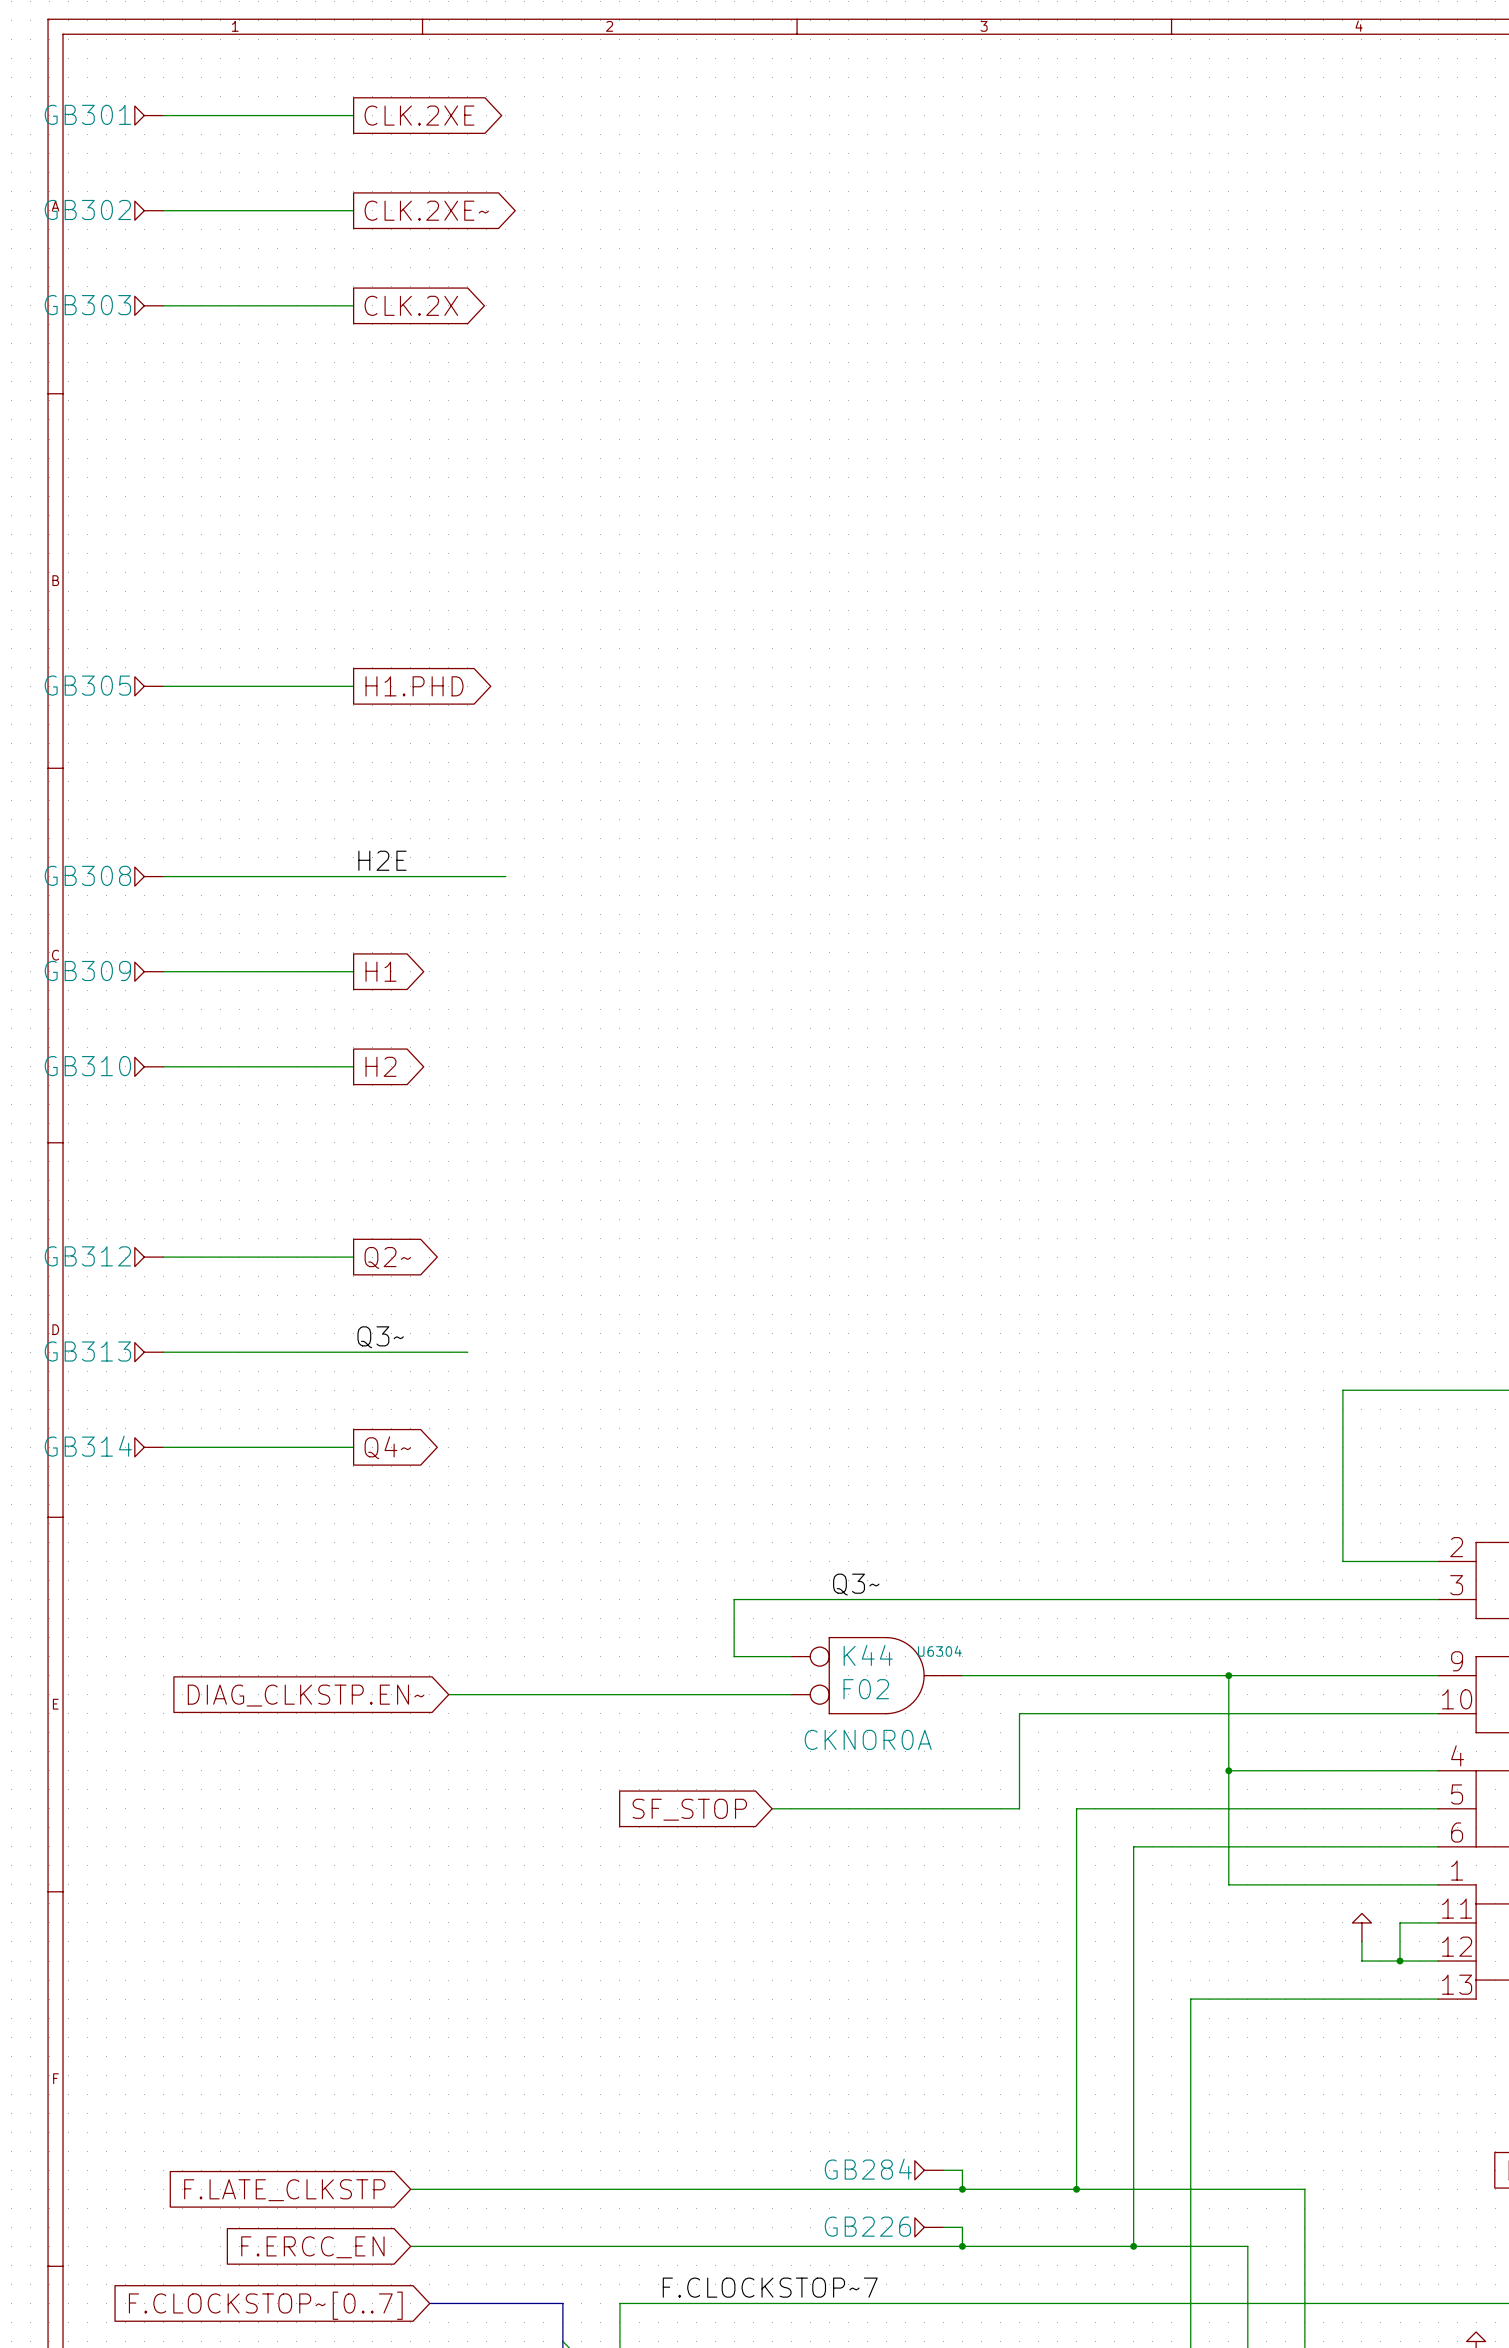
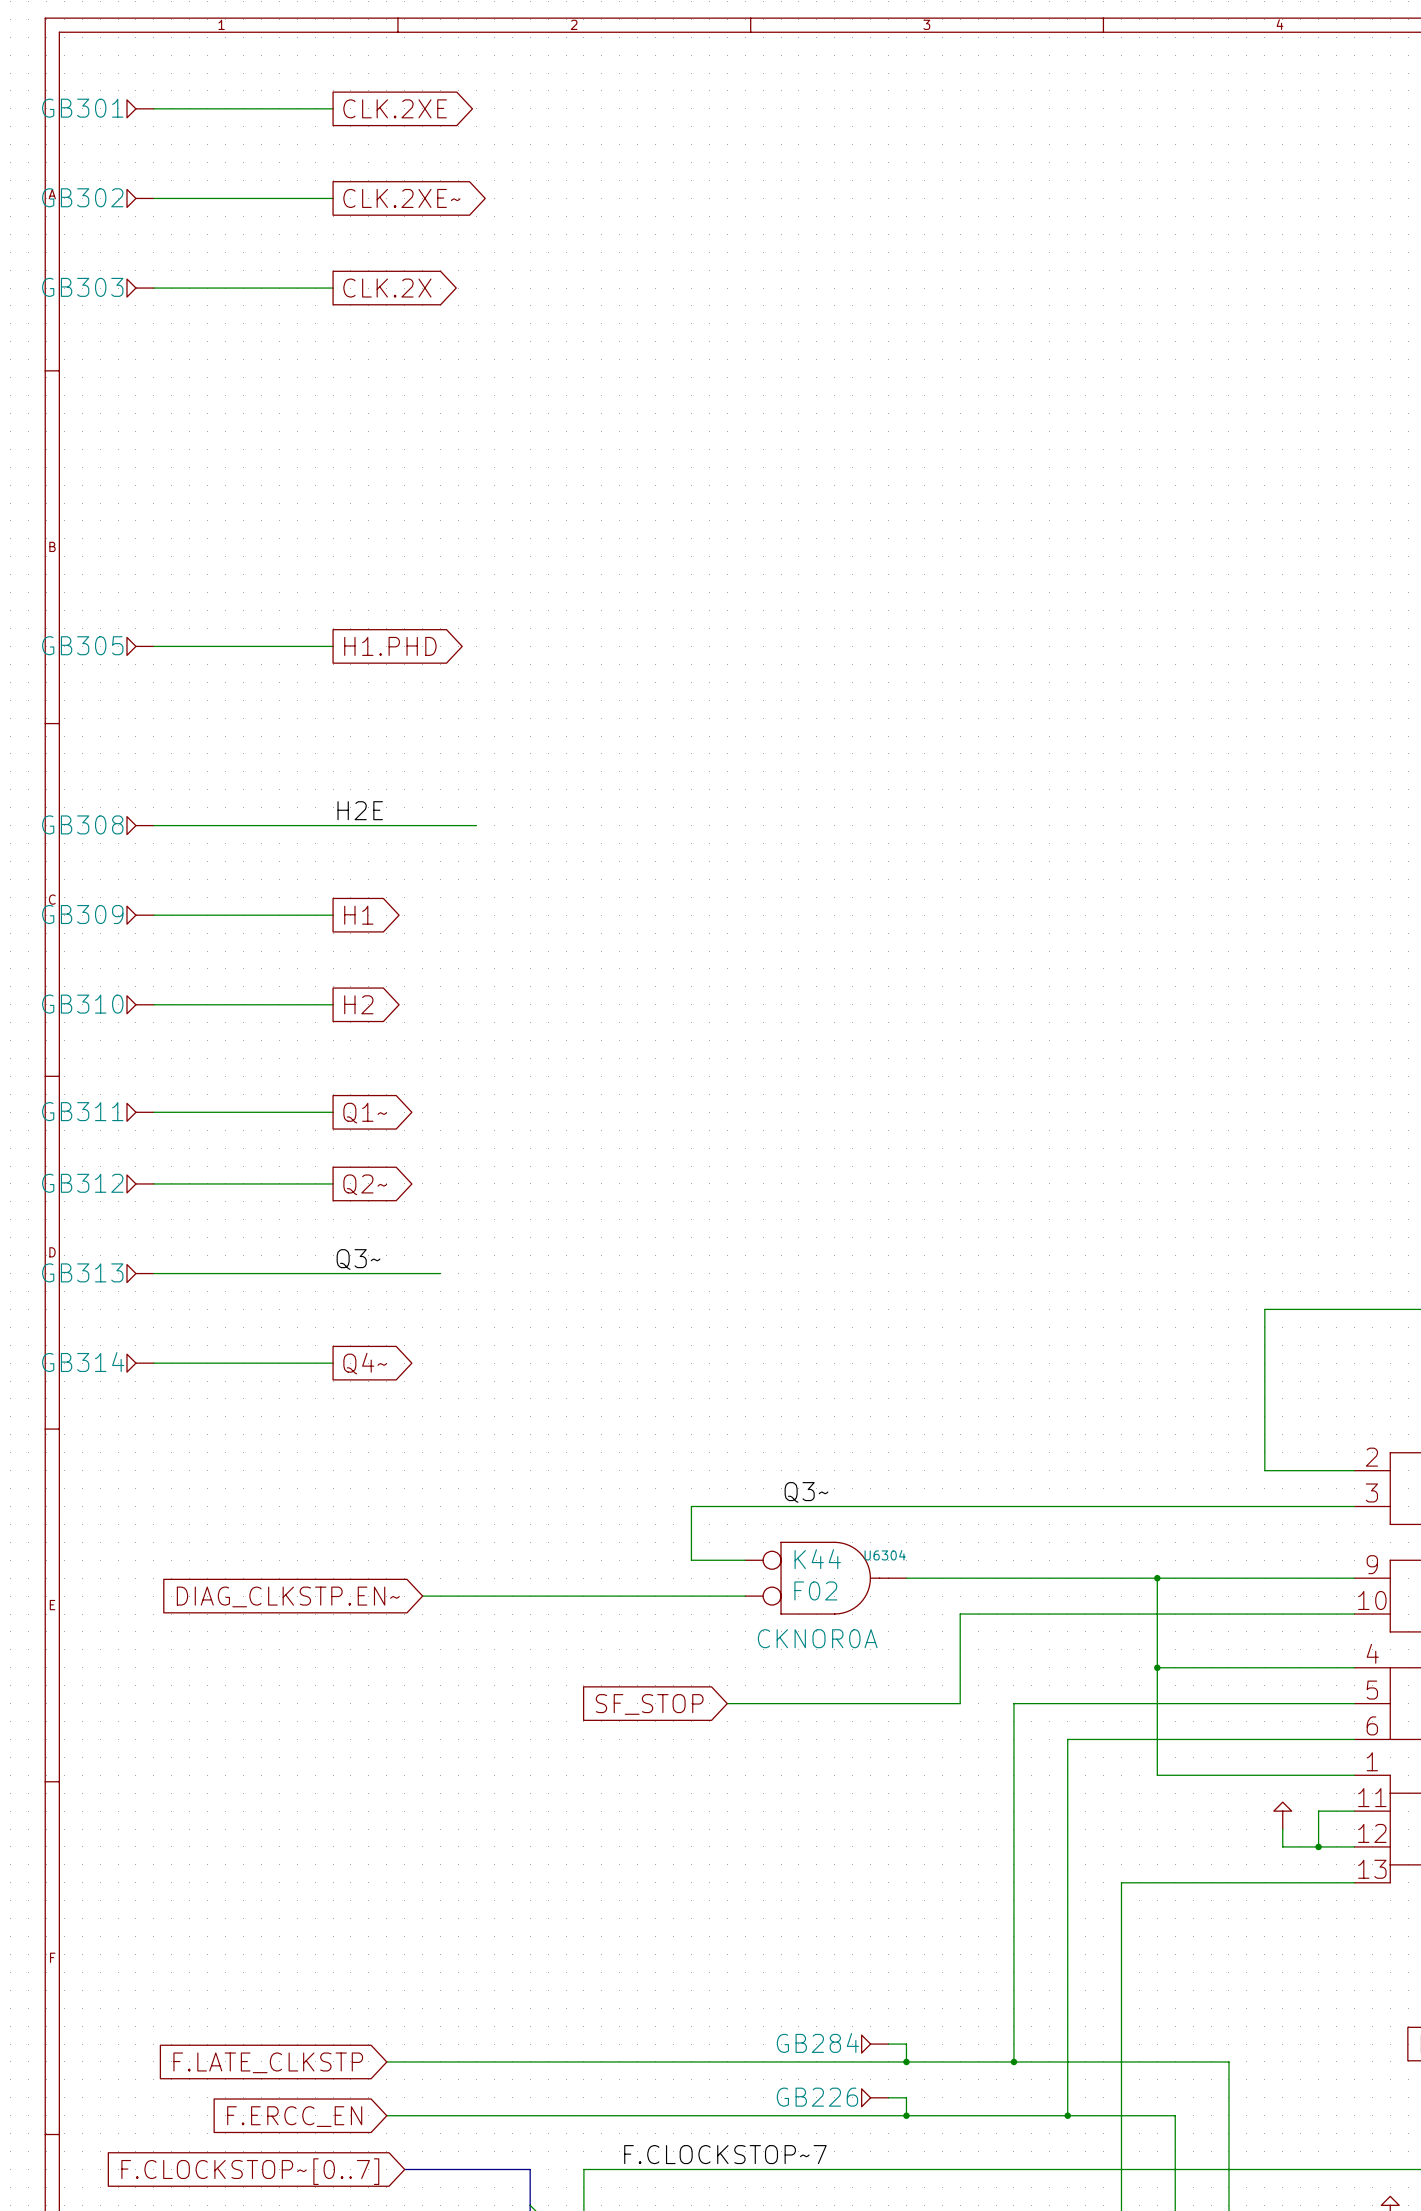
GB311: none -> (140, 1112)
wire: none -> (153, 1112) (333, 1112)
global label: none -> Q1~ (365, 1113)

